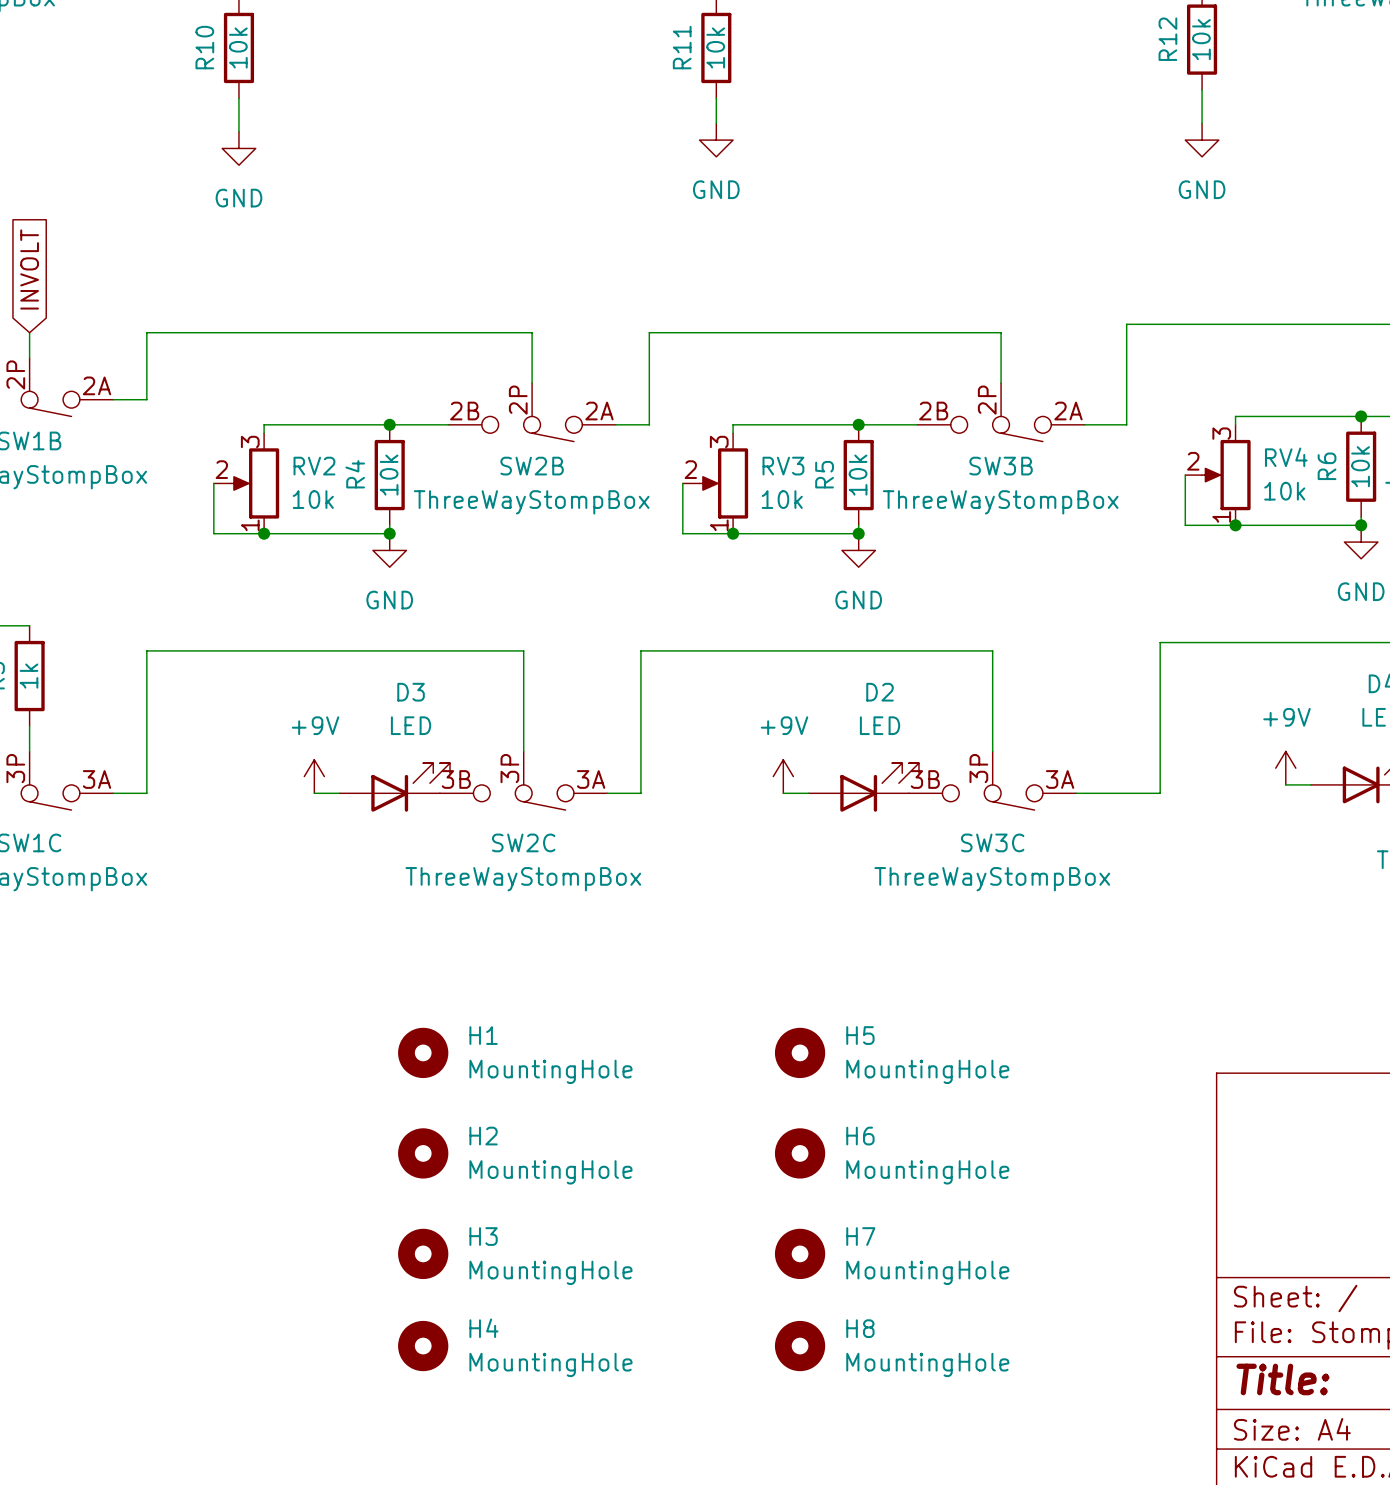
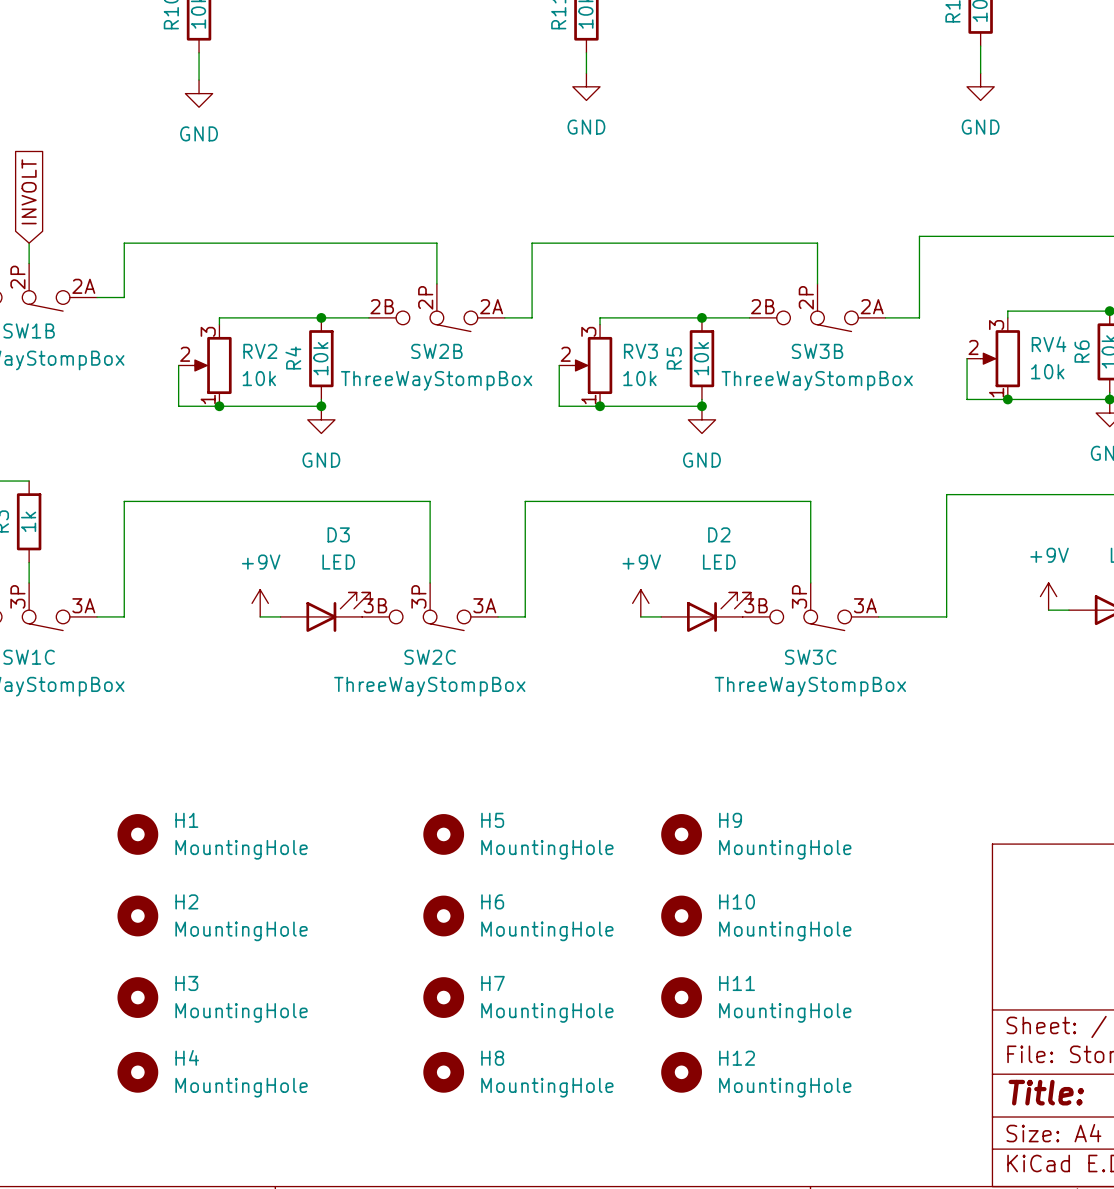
H1 position: (423, 1052) -> (137, 834)
H5 position: (800, 1052) -> (443, 834)
H9: none -> MountingHole (681, 834)
H2 position: (423, 1153) -> (137, 916)
H6 position: (800, 1153) -> (443, 916)
H10: none -> MountingHole (681, 916)
H3 position: (423, 1253) -> (137, 997)
H7 position: (800, 1253) -> (443, 997)
H11: none -> MountingHole (681, 997)
H4 position: (423, 1346) -> (137, 1072)
H8 position: (800, 1346) -> (443, 1072)
H12: none -> MountingHole (681, 1072)

